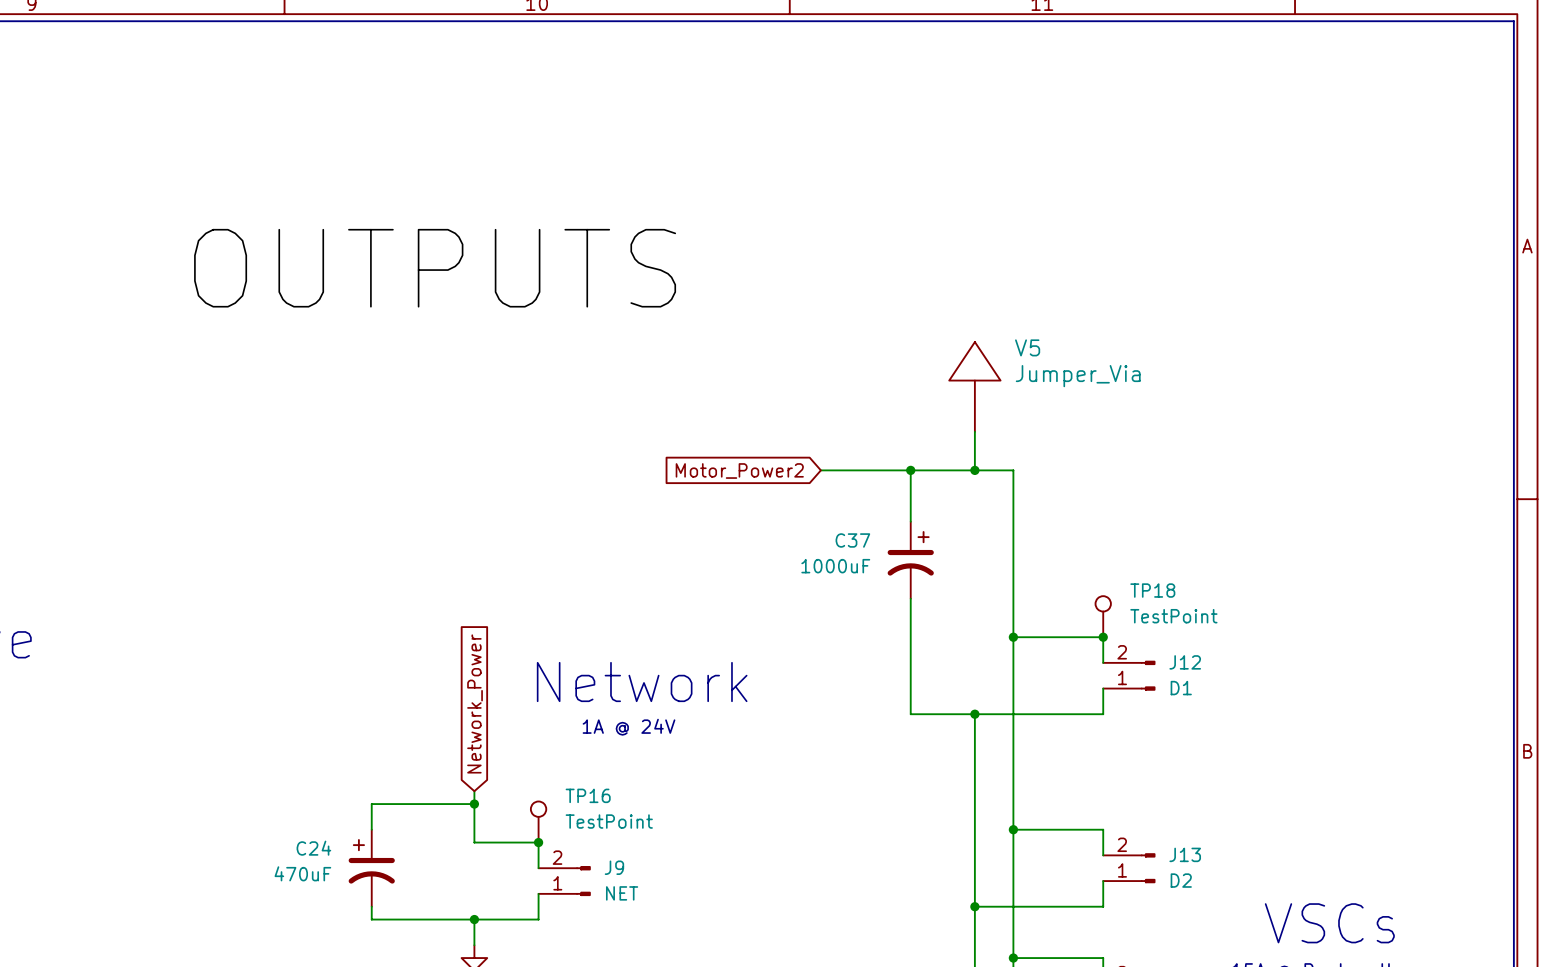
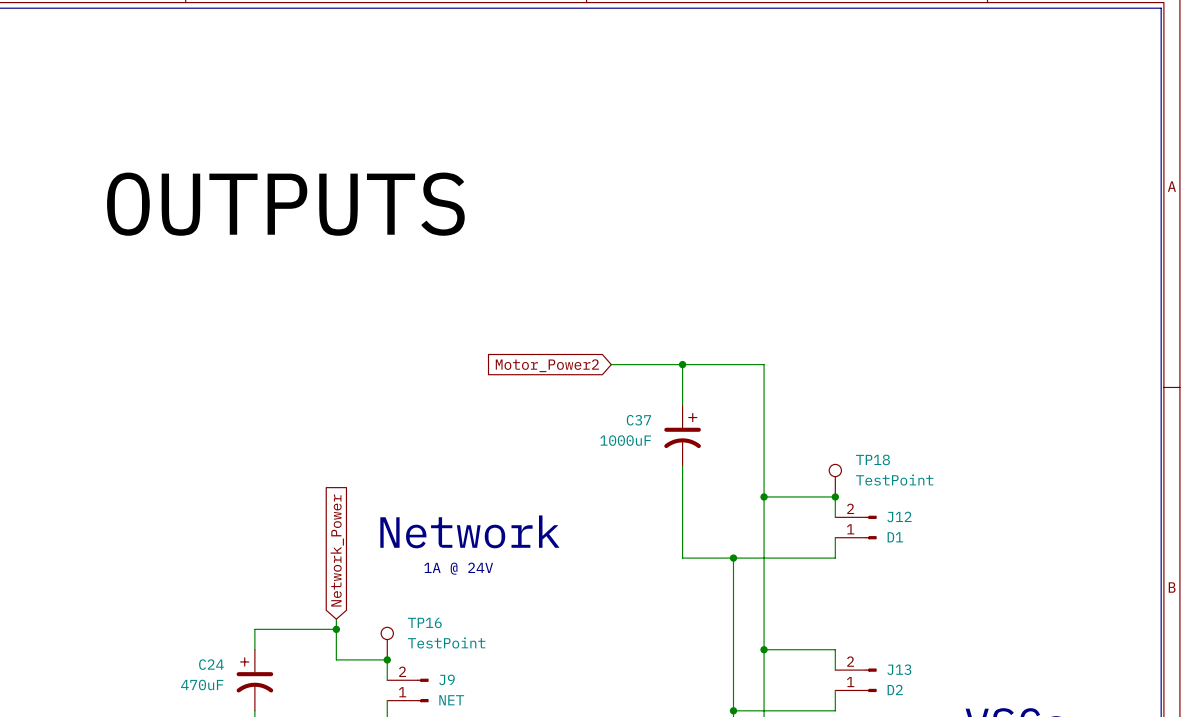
V5: Jumper_Via (974, 386) -> none
wire: (974, 431) (974, 470) -> none
junction: (974, 470) -> none

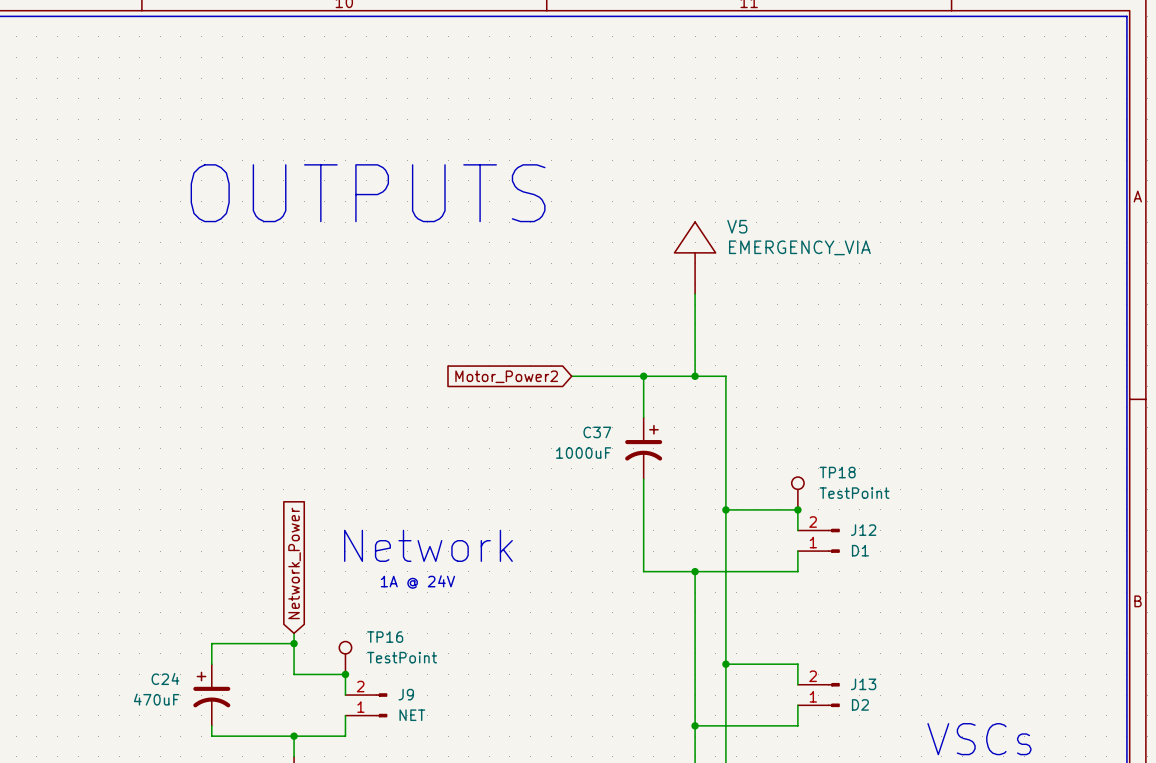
text: none -> OUTPUTS (368, 193)
label: OUTPUTS (285, 204) -> none
V5: none -> EMERGENCY_VIA (695, 258)
wire: none -> (695, 294) (695, 376)
junction: none -> (695, 376)

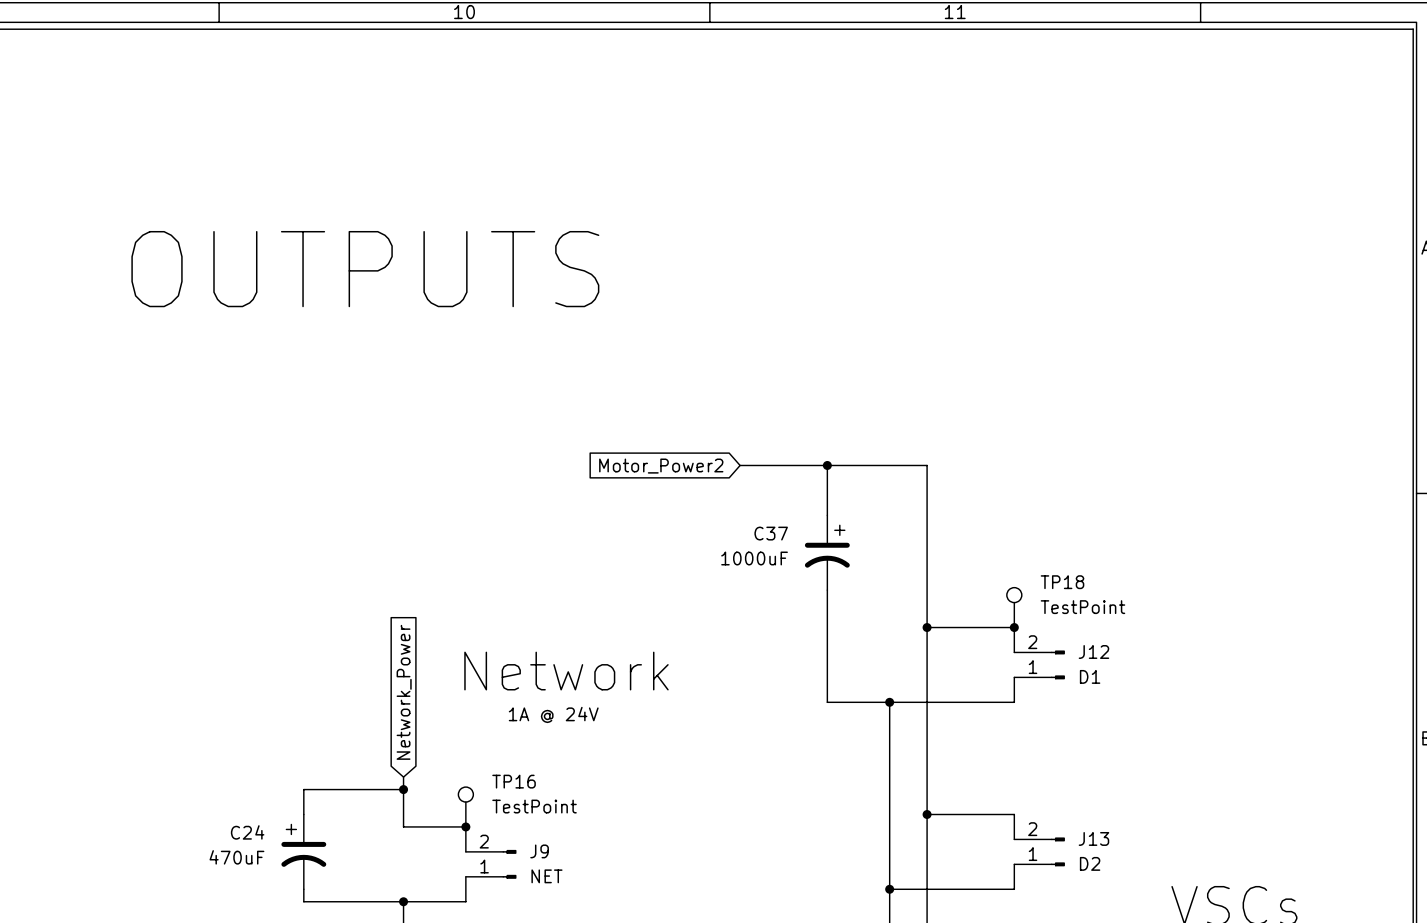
text: OUTPUTS (368, 193) -> none
label: none -> OUTPUTS (365, 269)
V5: EMERGENCY_VIA (695, 258) -> none
wire: (695, 294) (695, 376) -> none
junction: (695, 376) -> none

